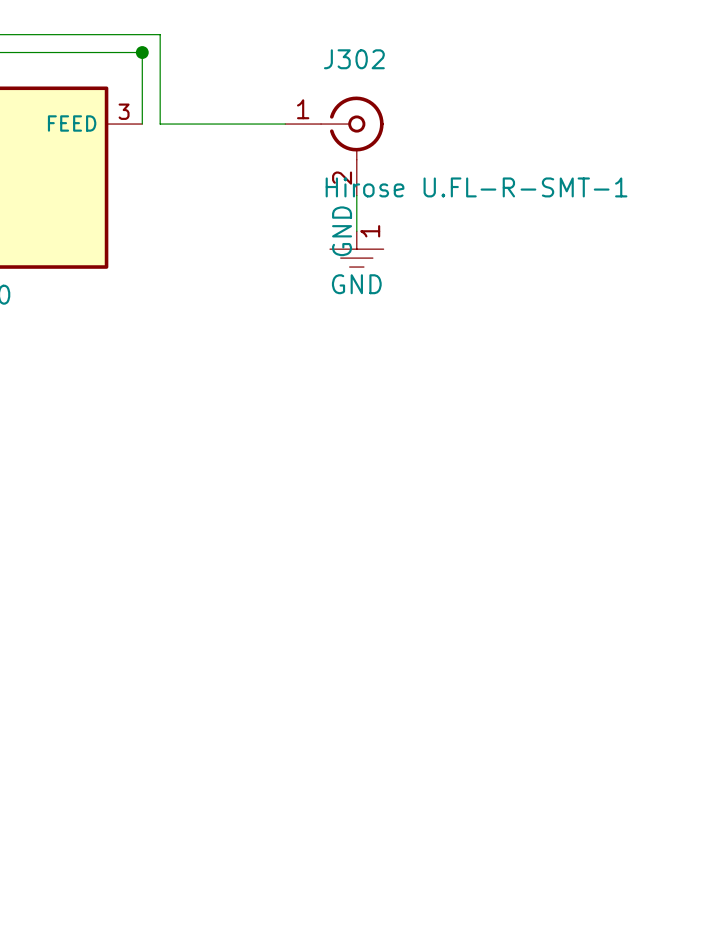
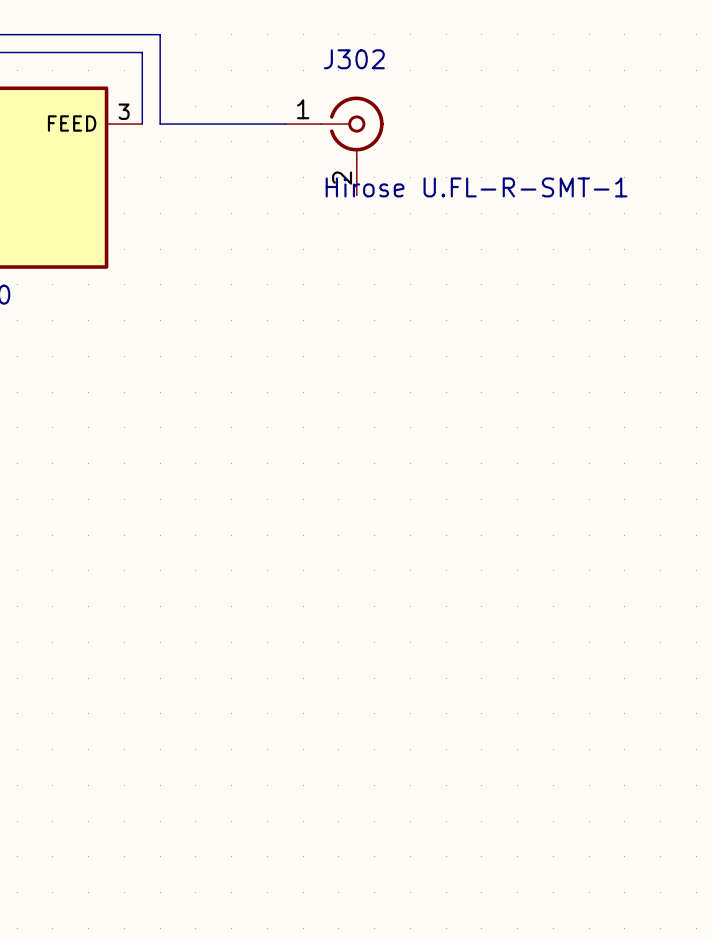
junction: (142, 52) -> none
wire: (356, 195) (356, 231) -> none
power symbol: GND (356, 249) -> none

